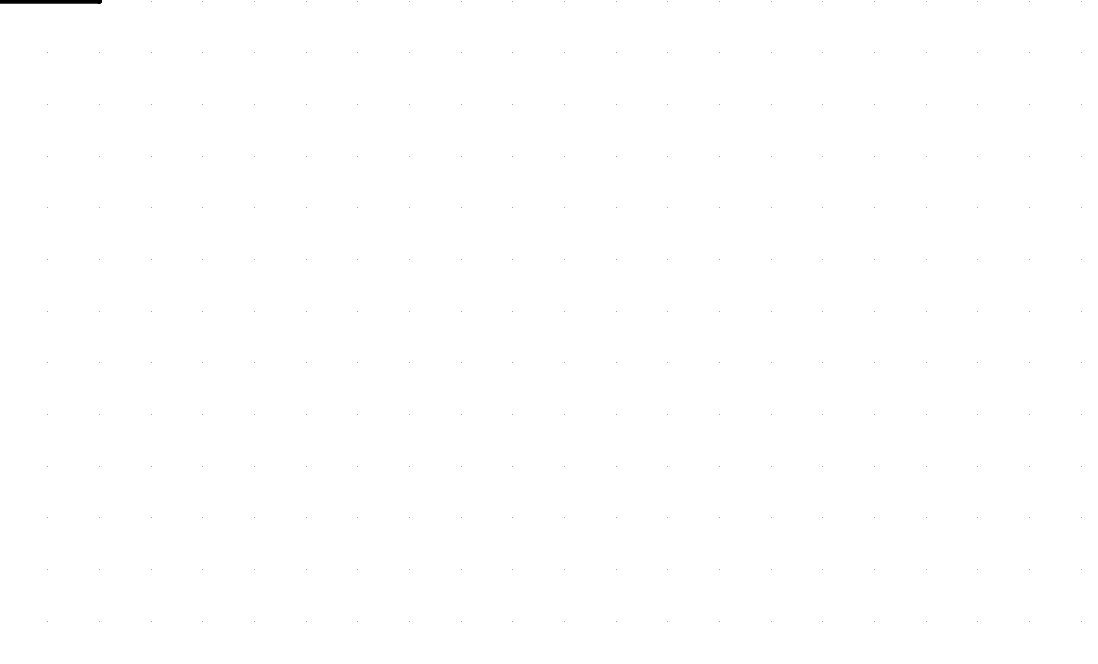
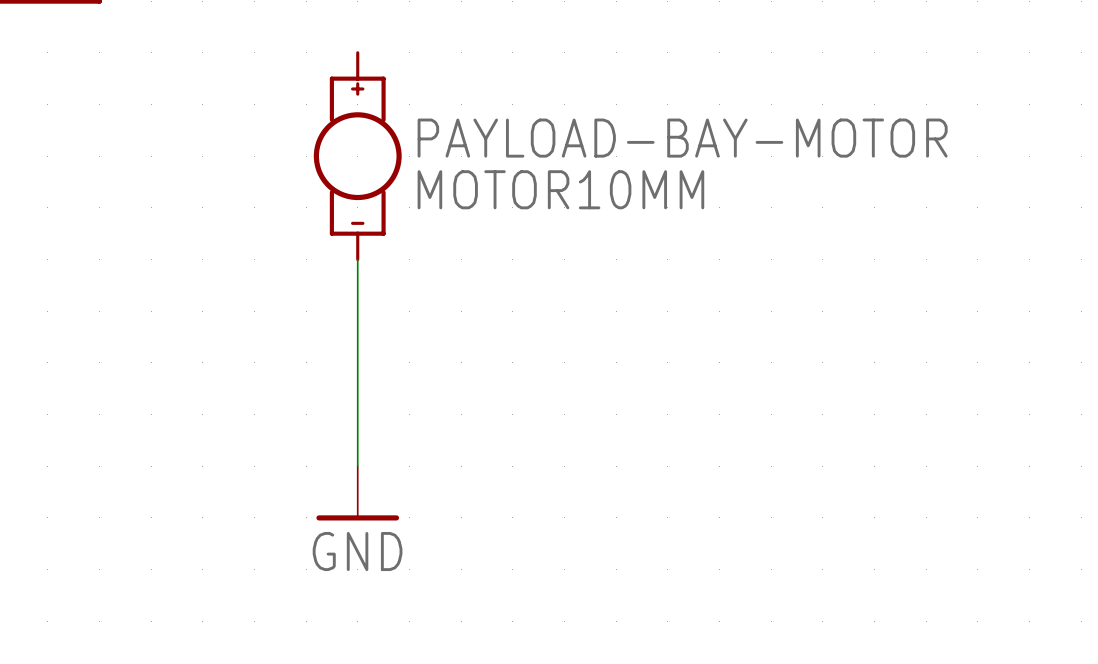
PAYLOAD-BAY-MOTOR: none -> MOTOR10MM (357, 156)
wire: none -> (357, 259) (357, 466)
power symbol: none -> GND (357, 493)

